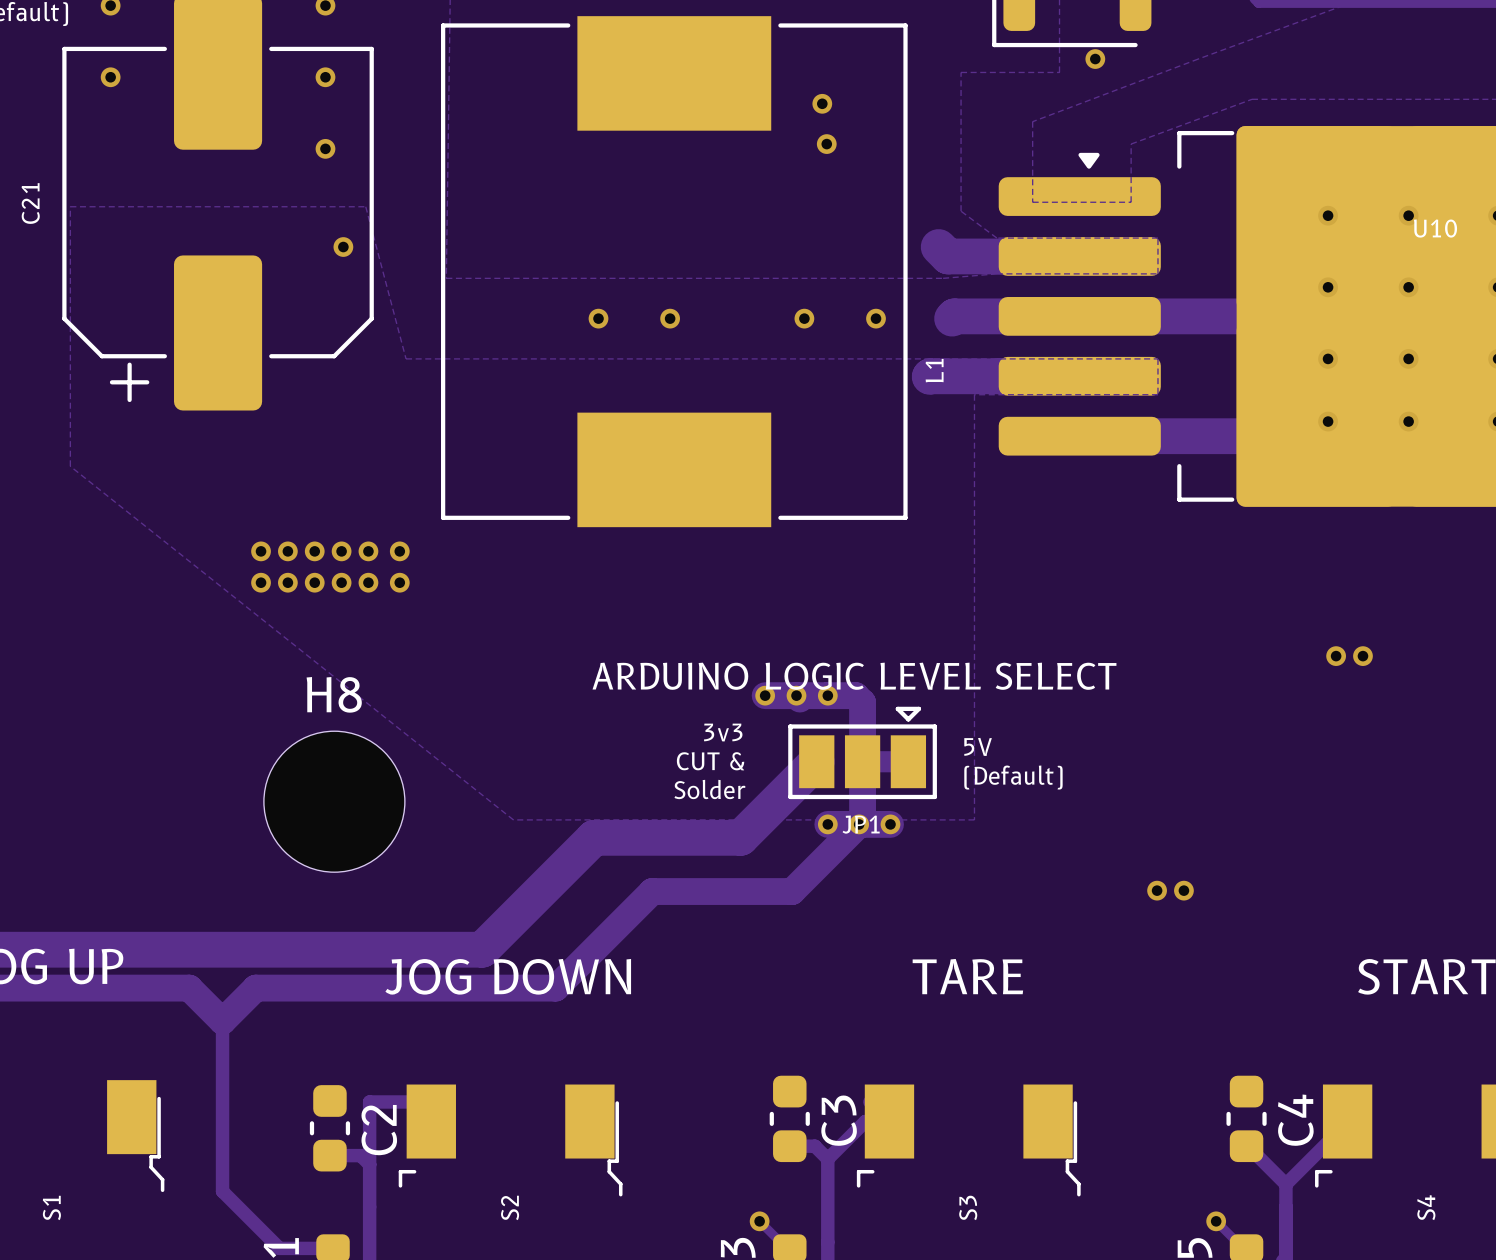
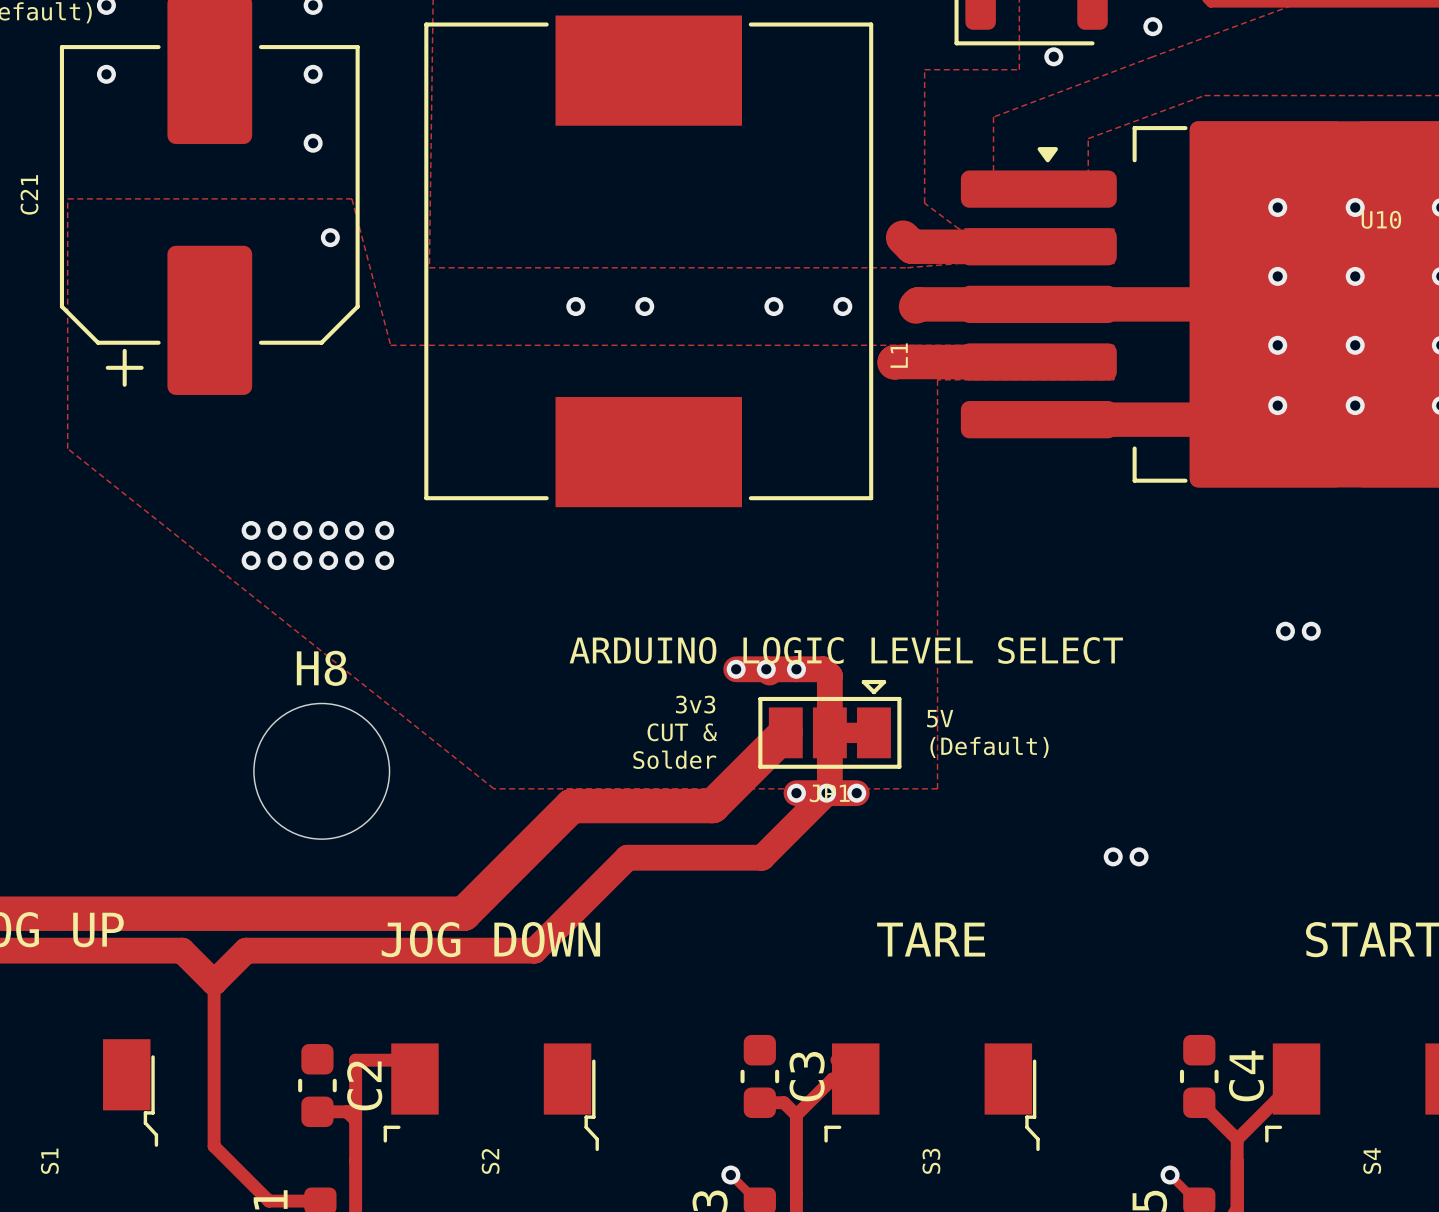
via: none -> (1152, 26)
via: (822, 103) -> none
via: (826, 144) -> none

